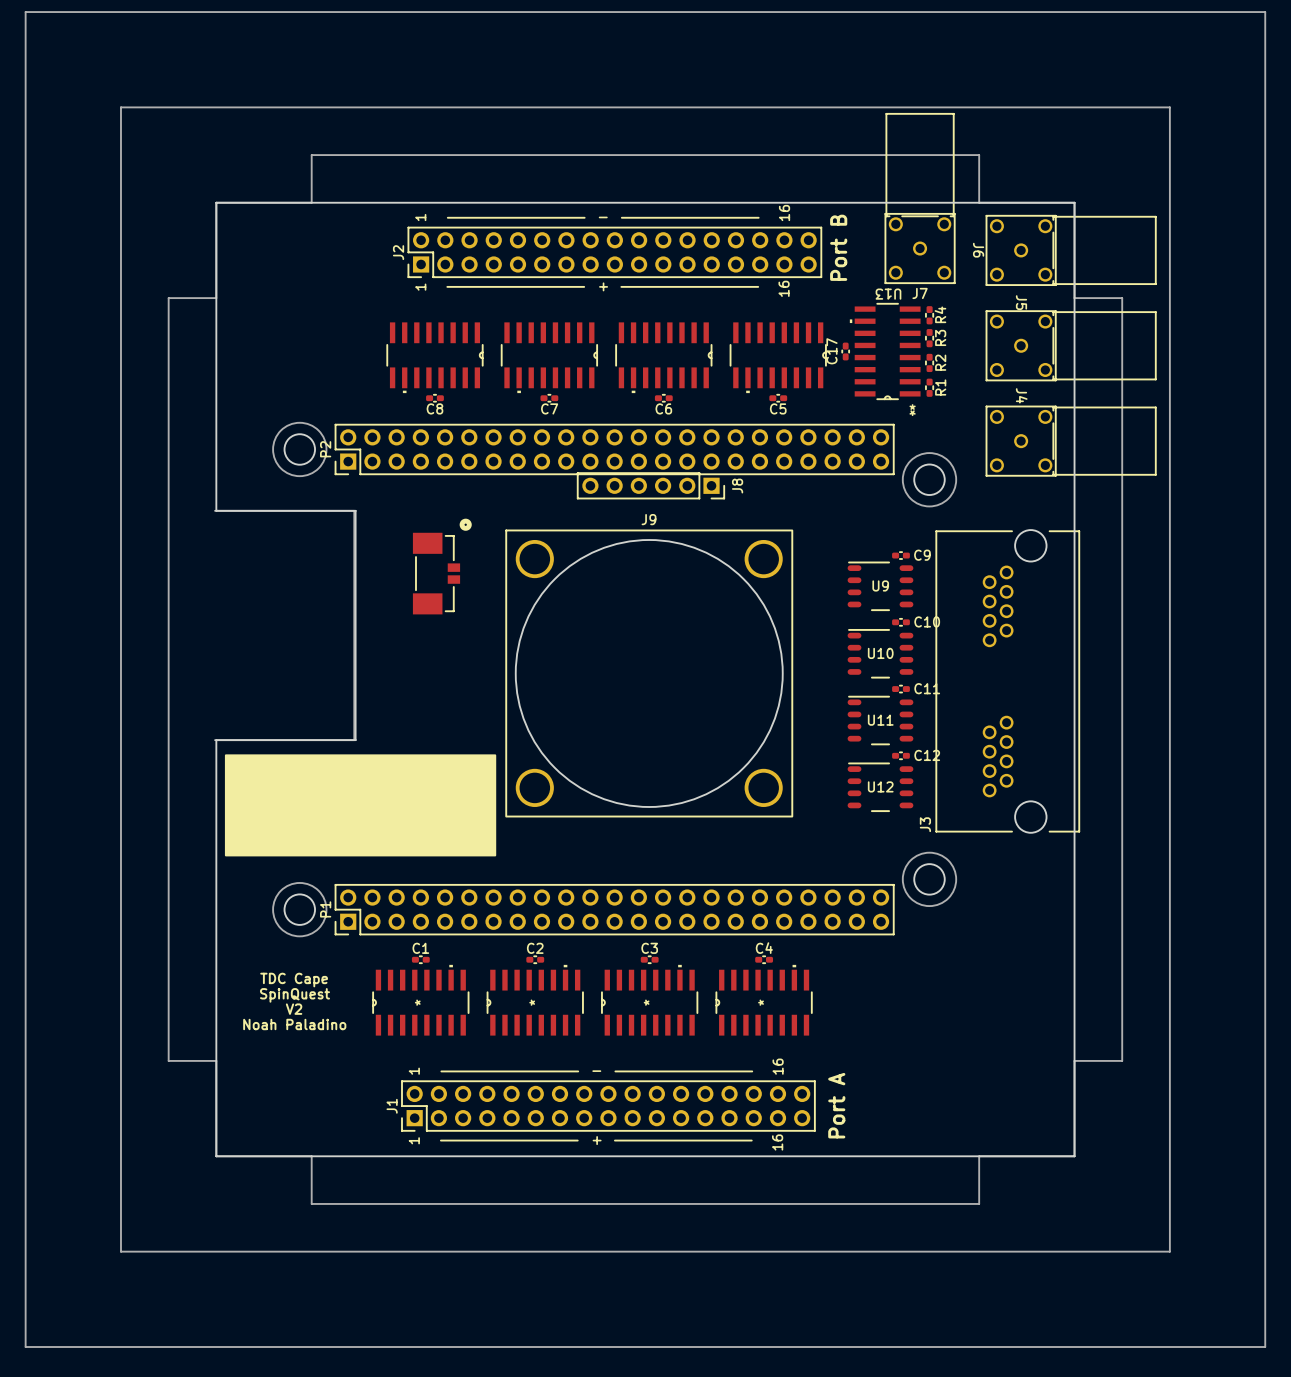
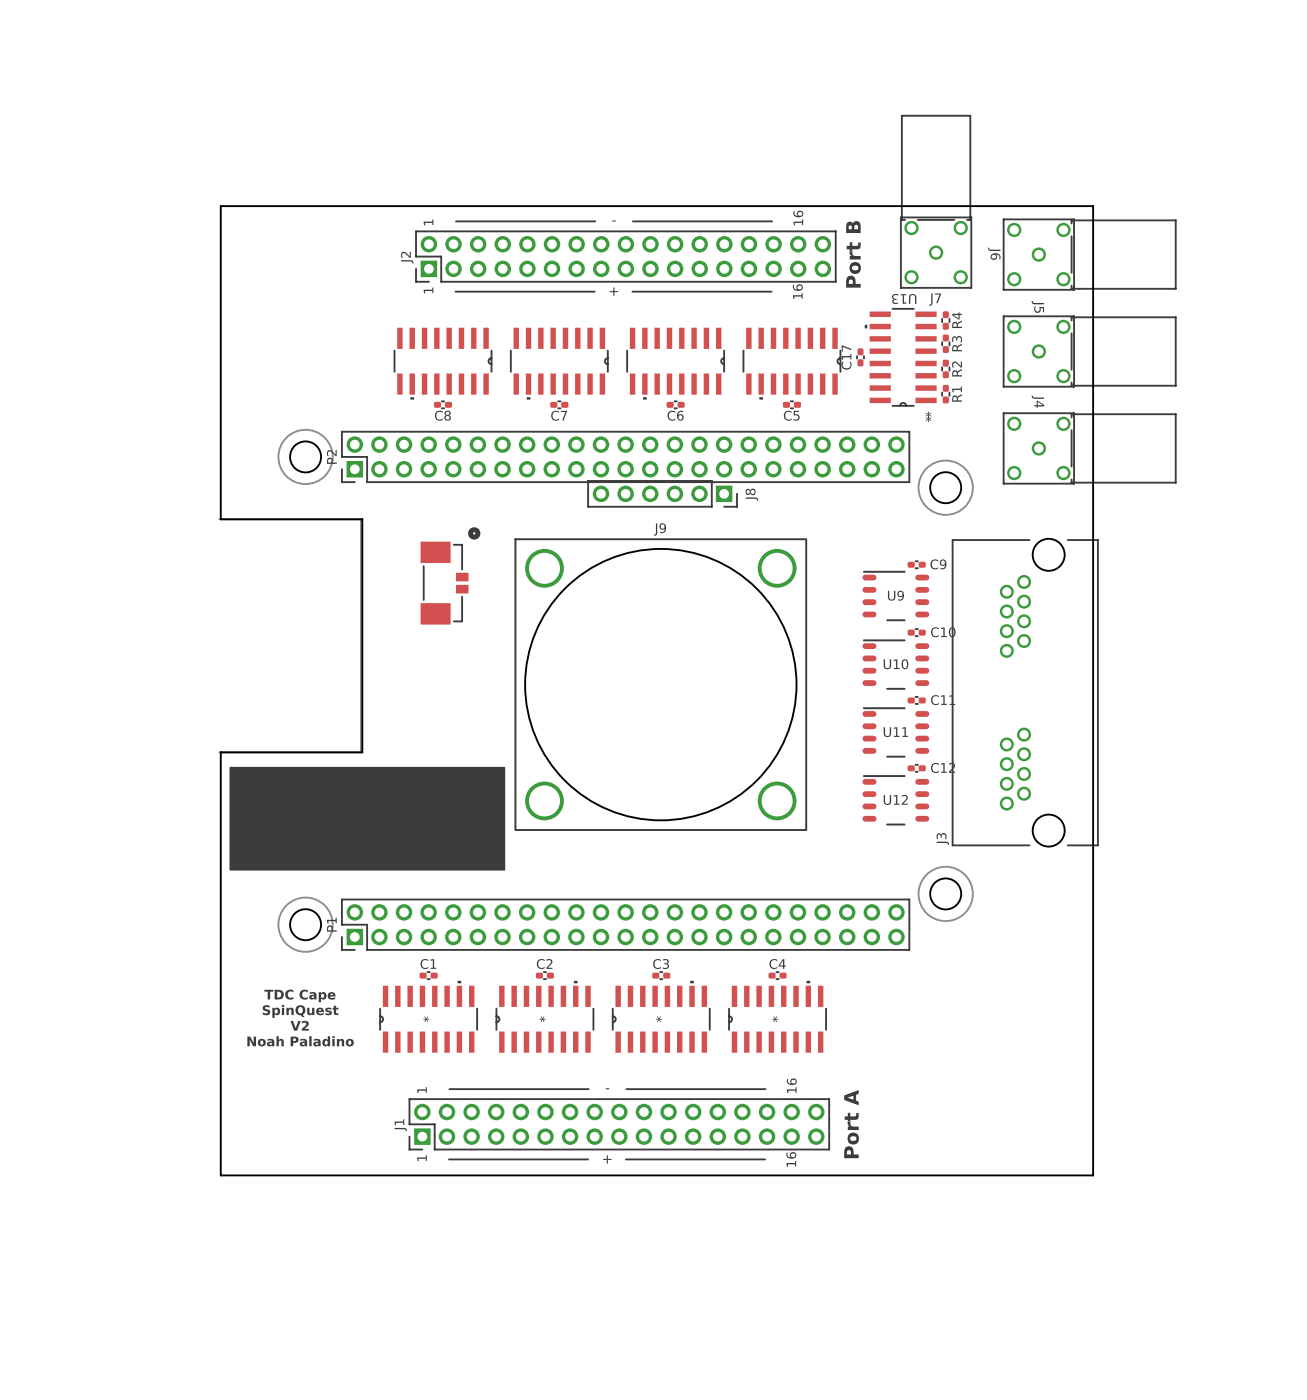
line: (25, 12) (1265, 12) (1265, 1347) (25, 1347) (25, 12) -> none
line: (120, 107) (1169, 107) (1169, 1251) (120, 1251) (120, 107) -> none
line: (311, 155) (979, 155) (979, 202) (1074, 202) (1074, 298) (1122, 298) (1122, 1060) (1074, 1060) (1074, 1156) (979, 1156) (979, 1203) (311, 1203) (311, 1156) (216, 1156) (216, 1060) (168, 1060) (168, 298) (216, 298) (216, 202) (311, 202) (311, 155) -> none

